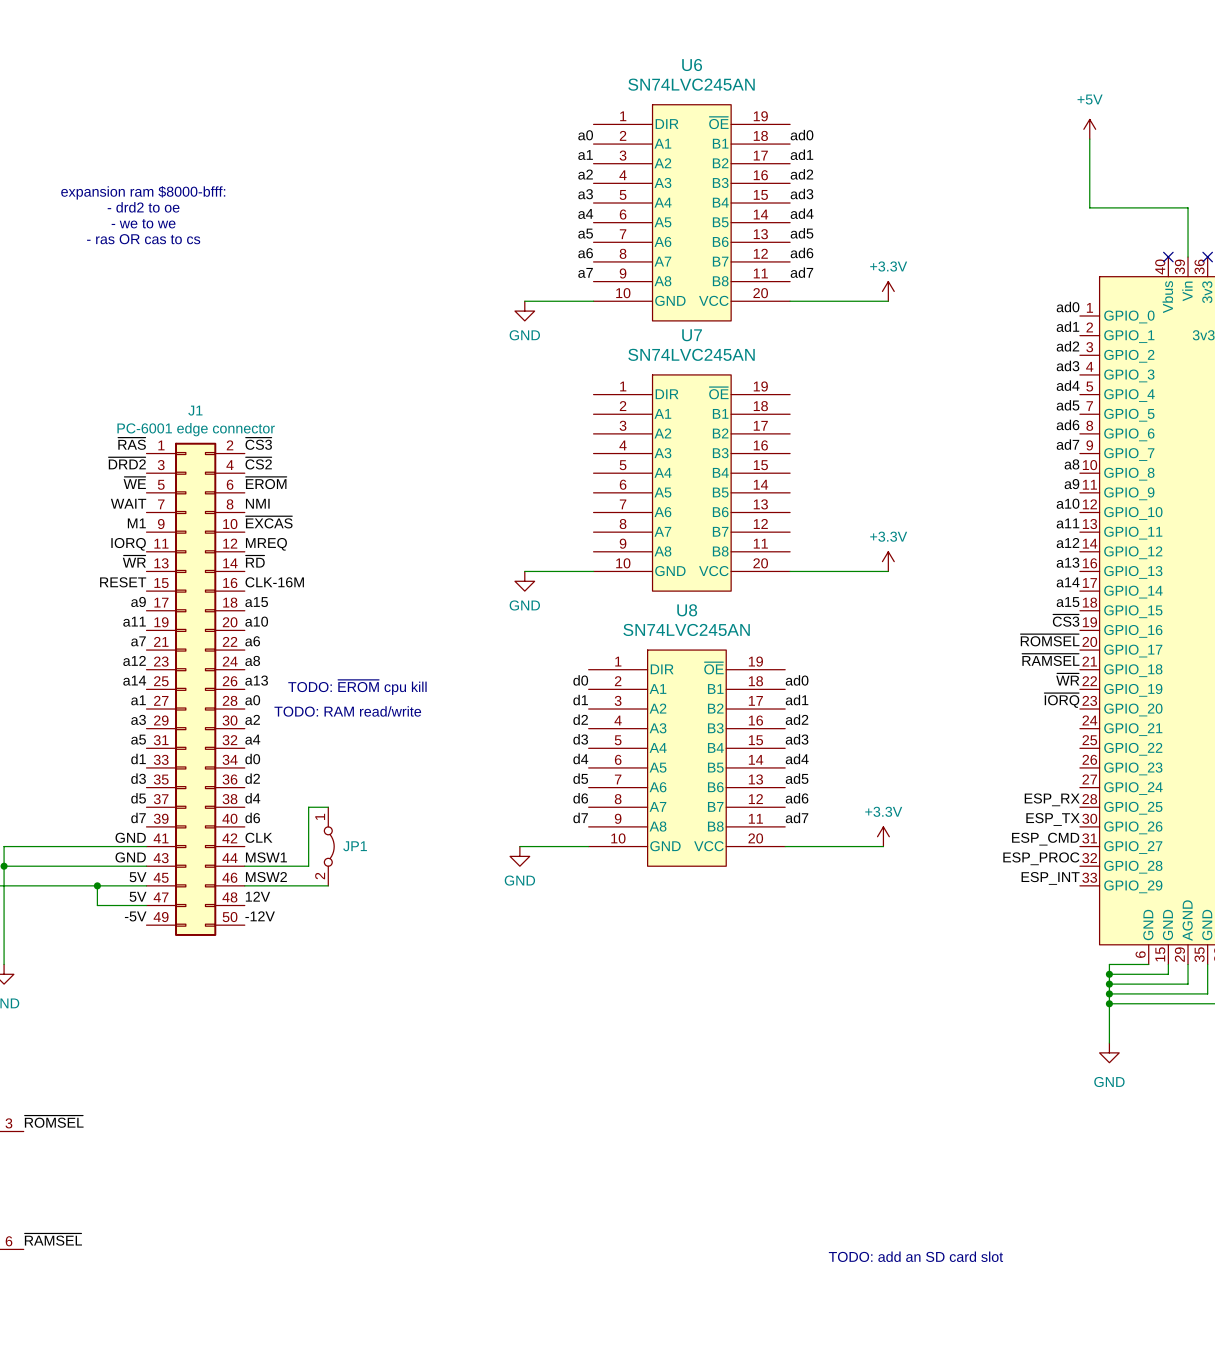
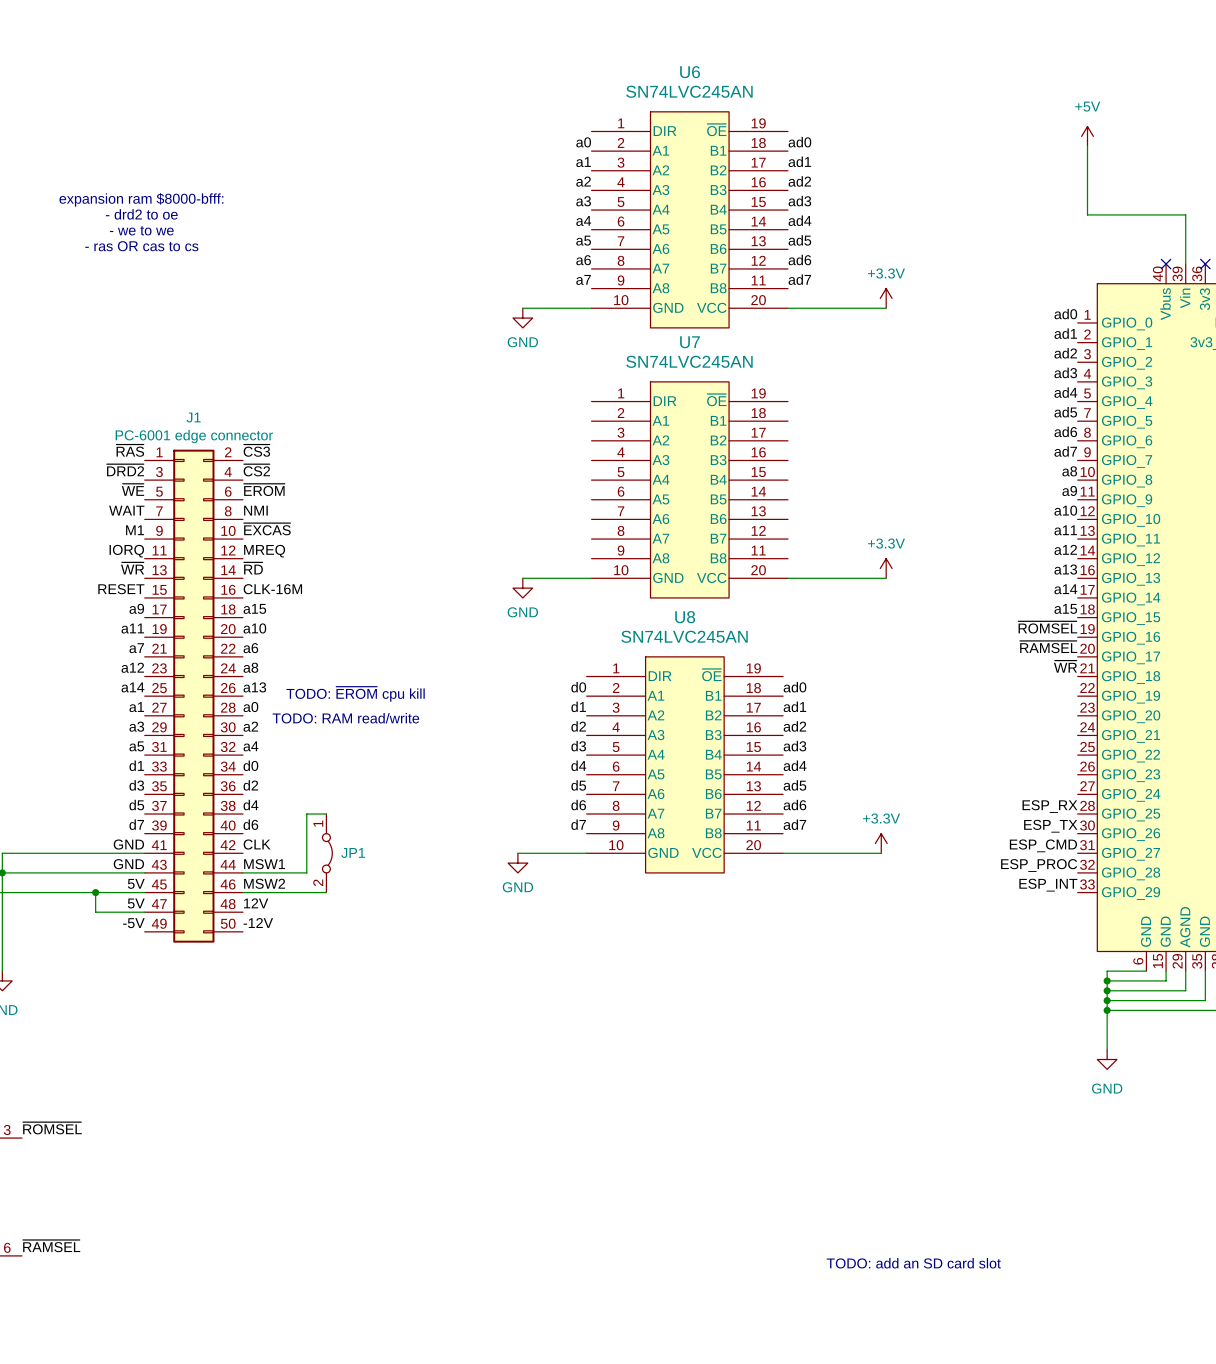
label: ~{CS3} (1066, 620) -> ~{ROMSEL} (1047, 627)
label: ~{ROMSEL} (1050, 640) -> ~{RAMSEL} (1048, 647)
label: ~{RAMSEL} (1050, 659) -> ~{WR} (1065, 666)
label: ~{WR} (1067, 679) -> none
label: ~{IORQ} (1061, 700) -> none

